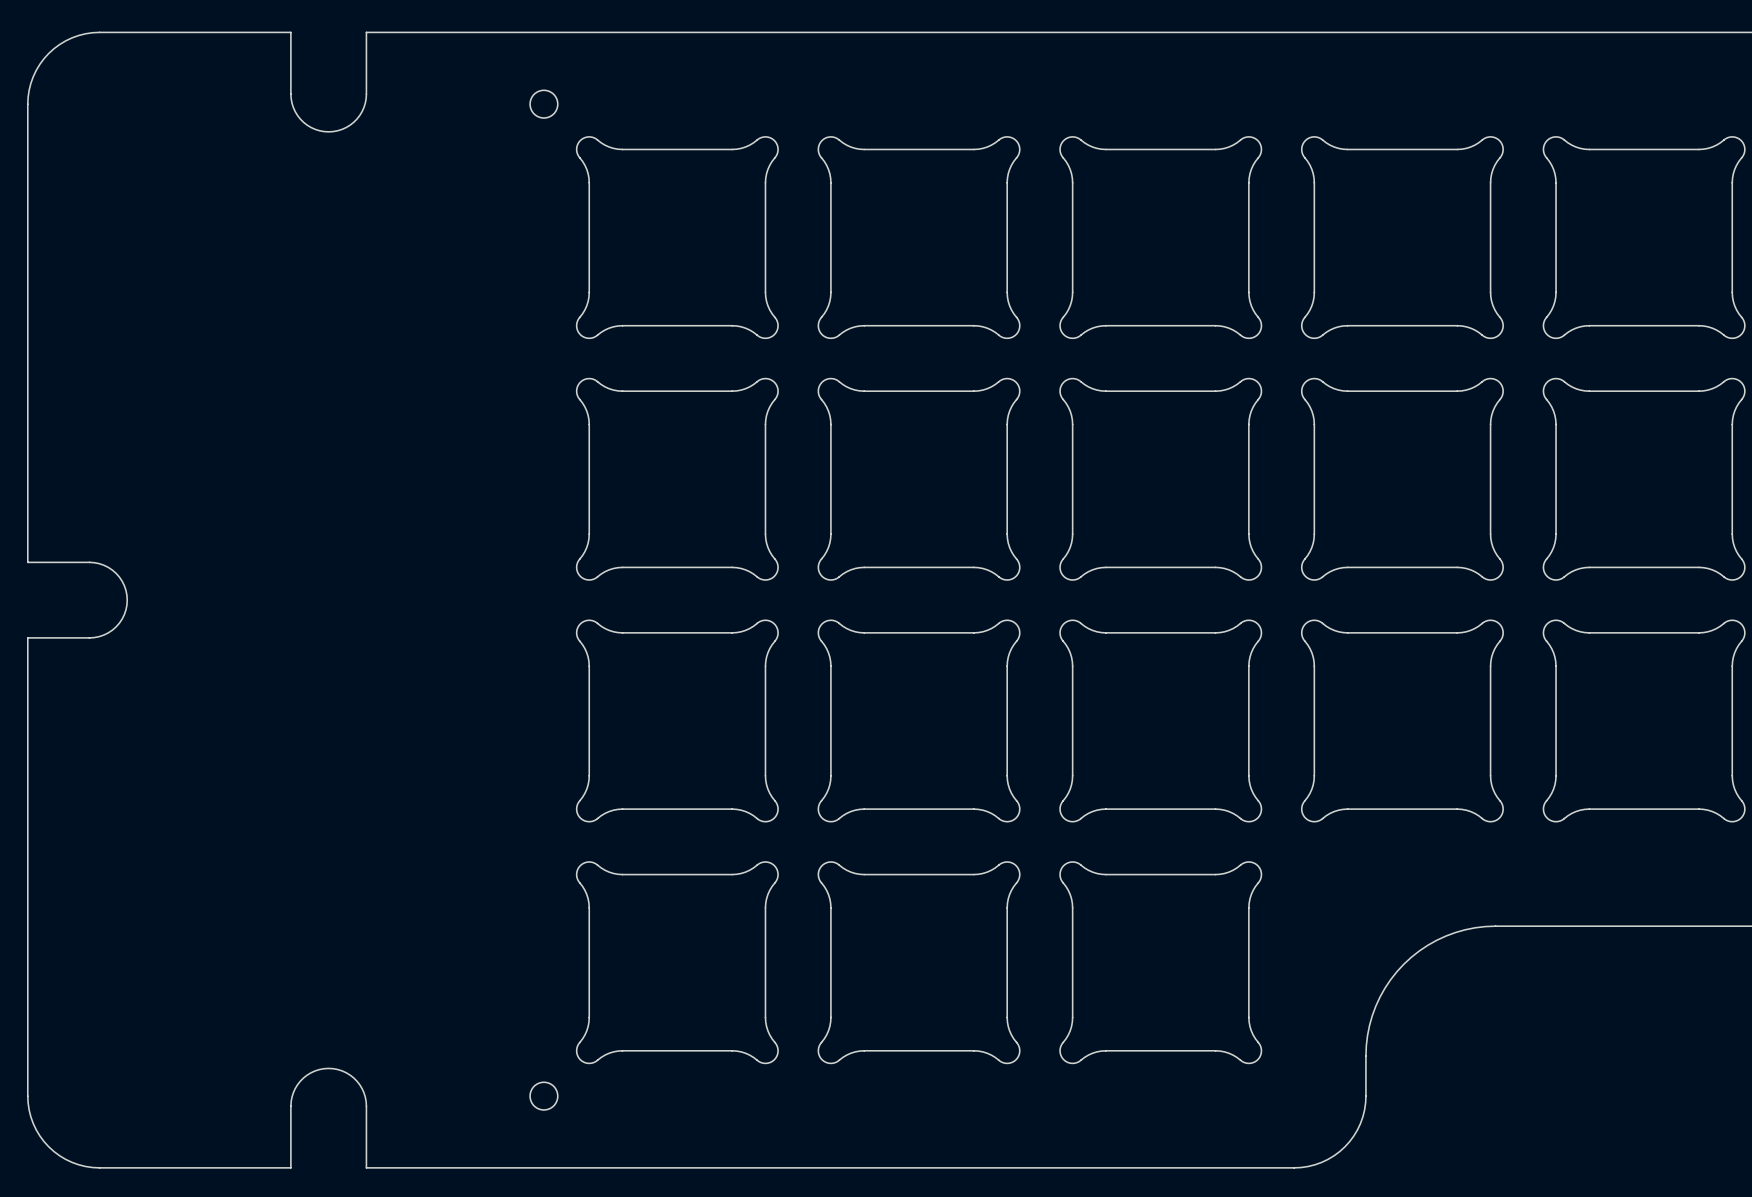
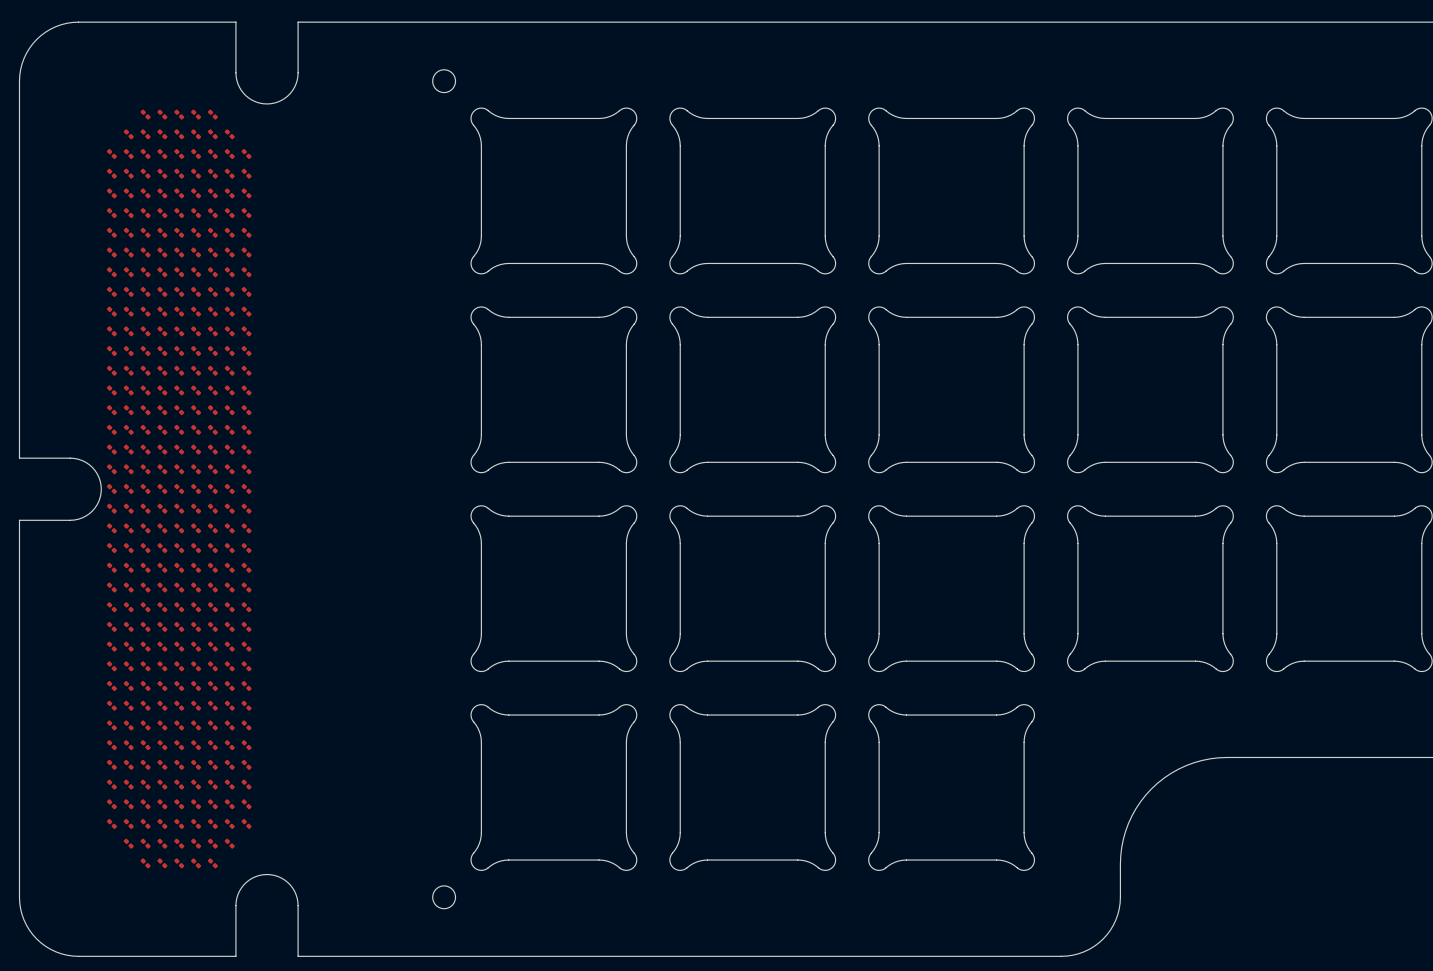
part: none -> (145, 114)
part: none -> (162, 114)
part: none -> (179, 114)
part: none -> (196, 114)
part: none -> (212, 114)
part: none -> (128, 134)
part: none -> (145, 134)
part: none -> (162, 134)
part: none -> (179, 134)
part: none -> (196, 134)
part: none -> (212, 134)
part: none -> (229, 134)
part: none -> (111, 153)
part: none -> (128, 153)
part: none -> (145, 153)
part: none -> (162, 153)
part: none -> (179, 153)
part: none -> (196, 153)
part: none -> (212, 153)
part: none -> (229, 153)
part: none -> (246, 153)
part: none -> (111, 173)
part: none -> (128, 173)
part: none -> (145, 173)
part: none -> (162, 173)
part: none -> (179, 173)
part: none -> (196, 173)
part: none -> (212, 173)
part: none -> (229, 173)
part: none -> (246, 173)
part: none -> (111, 193)
part: none -> (128, 193)
part: none -> (145, 193)
part: none -> (162, 193)
part: none -> (179, 193)
part: none -> (196, 193)
part: none -> (212, 193)
part: none -> (229, 193)
part: none -> (246, 193)
part: none -> (111, 213)
part: none -> (128, 213)
part: none -> (145, 213)
part: none -> (162, 213)
part: none -> (179, 213)
part: none -> (196, 213)
part: none -> (212, 213)
part: none -> (229, 213)
part: none -> (246, 213)
part: none -> (111, 232)
part: none -> (128, 232)
part: none -> (145, 232)
part: none -> (162, 232)
part: none -> (179, 232)
part: none -> (196, 232)
part: none -> (212, 232)
part: none -> (229, 232)
part: none -> (246, 232)
part: none -> (111, 252)
part: none -> (128, 252)
part: none -> (145, 252)
part: none -> (162, 252)
part: none -> (179, 252)
part: none -> (196, 252)
part: none -> (212, 252)
part: none -> (229, 252)
part: none -> (246, 252)
part: none -> (111, 272)
part: none -> (128, 272)
part: none -> (145, 272)
part: none -> (162, 272)
part: none -> (179, 272)
part: none -> (196, 272)
part: none -> (212, 272)
part: none -> (229, 272)
part: none -> (246, 272)
part: none -> (111, 291)
part: none -> (128, 291)
part: none -> (145, 291)
part: none -> (162, 291)
part: none -> (179, 291)
part: none -> (196, 291)
part: none -> (212, 291)
part: none -> (229, 291)
part: none -> (246, 291)
part: none -> (111, 311)
part: none -> (128, 311)
part: none -> (145, 311)
part: none -> (162, 311)
part: none -> (179, 311)
part: none -> (196, 311)
part: none -> (212, 311)
part: none -> (229, 311)
part: none -> (246, 311)
part: none -> (111, 331)
part: none -> (128, 331)
part: none -> (145, 331)
part: none -> (162, 331)
part: none -> (179, 331)
part: none -> (196, 331)
part: none -> (212, 331)
part: none -> (229, 331)
part: none -> (246, 331)
part: none -> (111, 351)
part: none -> (128, 351)
part: none -> (145, 351)
part: none -> (162, 351)
part: none -> (179, 351)
part: none -> (196, 351)
part: none -> (212, 351)
part: none -> (229, 351)
part: none -> (246, 351)
part: none -> (111, 370)
part: none -> (128, 370)
part: none -> (145, 370)
part: none -> (162, 370)
part: none -> (179, 370)
part: none -> (196, 370)
part: none -> (212, 370)
part: none -> (229, 370)
part: none -> (246, 370)
part: none -> (111, 390)
part: none -> (128, 390)
part: none -> (145, 390)
part: none -> (162, 390)
part: none -> (179, 390)
part: none -> (196, 390)
part: none -> (212, 390)
part: none -> (229, 390)
part: none -> (246, 390)
part: none -> (111, 410)
part: none -> (128, 410)
part: none -> (145, 410)
part: none -> (162, 410)
part: none -> (179, 410)
part: none -> (196, 410)
part: none -> (212, 410)
part: none -> (229, 410)
part: none -> (246, 410)
part: none -> (111, 429)
part: none -> (128, 429)
part: none -> (145, 429)
part: none -> (162, 429)
part: none -> (179, 429)
part: none -> (196, 429)
part: none -> (212, 429)
part: none -> (229, 429)
part: none -> (246, 429)
part: none -> (111, 449)
part: none -> (128, 449)
part: none -> (145, 449)
part: none -> (162, 449)
part: none -> (179, 449)
part: none -> (196, 449)
part: none -> (212, 449)
part: none -> (229, 449)
part: none -> (246, 449)
part: none -> (111, 469)
part: none -> (128, 469)
part: none -> (145, 469)
part: none -> (162, 469)
part: none -> (179, 469)
part: none -> (196, 469)
part: none -> (212, 469)
part: none -> (229, 469)
part: none -> (246, 469)
part: none -> (111, 488)
part: none -> (128, 488)
part: none -> (145, 488)
part: none -> (162, 488)
part: none -> (179, 488)
part: none -> (196, 488)
part: none -> (212, 488)
part: none -> (229, 488)
part: none -> (246, 488)
part: none -> (111, 508)
part: none -> (128, 508)
part: none -> (145, 508)
part: none -> (162, 508)
part: none -> (179, 508)
part: none -> (196, 508)
part: none -> (212, 508)
part: none -> (229, 508)
part: none -> (246, 508)
part: none -> (111, 528)
part: none -> (128, 528)
part: none -> (145, 528)
part: none -> (162, 528)
part: none -> (179, 528)
part: none -> (196, 528)
part: none -> (212, 528)
part: none -> (229, 528)
part: none -> (246, 528)
part: none -> (111, 548)
part: none -> (128, 548)
part: none -> (145, 548)
part: none -> (162, 548)
part: none -> (179, 548)
part: none -> (196, 548)
part: none -> (212, 548)
part: none -> (229, 548)
part: none -> (246, 548)
part: none -> (111, 567)
part: none -> (128, 567)
part: none -> (145, 567)
part: none -> (162, 567)
part: none -> (179, 567)
part: none -> (196, 567)
part: none -> (212, 567)
part: none -> (229, 567)
part: none -> (246, 567)
part: none -> (111, 587)
part: none -> (128, 587)
part: none -> (145, 587)
part: none -> (162, 587)
part: none -> (179, 587)
part: none -> (196, 587)
part: none -> (212, 587)
part: none -> (229, 587)
part: none -> (246, 587)
part: none -> (111, 607)
part: none -> (128, 607)
part: none -> (145, 607)
part: none -> (162, 607)
part: none -> (179, 607)
part: none -> (196, 607)
part: none -> (212, 607)
part: none -> (229, 607)
part: none -> (246, 607)
part: none -> (111, 626)
part: none -> (128, 626)
part: none -> (145, 626)
part: none -> (162, 626)
part: none -> (179, 626)
part: none -> (196, 626)
part: none -> (212, 626)
part: none -> (229, 626)
part: none -> (246, 626)
part: none -> (111, 646)
part: none -> (128, 646)
part: none -> (145, 646)
part: none -> (162, 646)
part: none -> (179, 646)
part: none -> (196, 646)
part: none -> (212, 646)
part: none -> (229, 646)
part: none -> (246, 646)
part: none -> (111, 666)
part: none -> (128, 666)
part: none -> (145, 666)
part: none -> (162, 666)
part: none -> (179, 666)
part: none -> (196, 666)
part: none -> (212, 666)
part: none -> (229, 666)
part: none -> (246, 666)
part: none -> (111, 686)
part: none -> (128, 686)
part: none -> (145, 686)
part: none -> (162, 686)
part: none -> (179, 686)
part: none -> (196, 686)
part: none -> (212, 686)
part: none -> (229, 686)
part: none -> (246, 686)
part: none -> (111, 705)
part: none -> (128, 705)
part: none -> (145, 705)
part: none -> (162, 705)
part: none -> (179, 705)
part: none -> (196, 705)
part: none -> (212, 705)
part: none -> (229, 705)
part: none -> (246, 705)
part: none -> (111, 725)
part: none -> (128, 725)
part: none -> (145, 725)
part: none -> (162, 725)
part: none -> (179, 725)
part: none -> (196, 725)
part: none -> (212, 725)
part: none -> (229, 725)
part: none -> (246, 725)
part: none -> (111, 745)
part: none -> (128, 745)
part: none -> (145, 745)
part: none -> (162, 745)
part: none -> (179, 745)
part: none -> (196, 745)
part: none -> (212, 745)
part: none -> (229, 745)
part: none -> (246, 745)
part: none -> (111, 764)
part: none -> (128, 764)
part: none -> (145, 764)
part: none -> (162, 764)
part: none -> (179, 764)
part: none -> (196, 764)
part: none -> (212, 764)
part: none -> (229, 764)
part: none -> (246, 764)
part: none -> (111, 784)
part: none -> (128, 784)
part: none -> (145, 784)
part: none -> (162, 784)
part: none -> (179, 784)
part: none -> (196, 784)
part: none -> (212, 784)
part: none -> (229, 784)
part: none -> (246, 784)
part: none -> (111, 804)
part: none -> (128, 804)
part: none -> (145, 804)
part: none -> (162, 804)
part: none -> (179, 804)
part: none -> (196, 804)
part: none -> (212, 804)
part: none -> (229, 804)
part: none -> (246, 804)
part: none -> (111, 823)
part: none -> (128, 823)
part: none -> (145, 823)
part: none -> (162, 823)
part: none -> (179, 823)
part: none -> (196, 823)
part: none -> (212, 823)
part: none -> (229, 823)
part: none -> (246, 823)
part: none -> (128, 843)
part: none -> (145, 843)
part: none -> (162, 843)
part: none -> (179, 843)
part: none -> (196, 843)
part: none -> (212, 843)
part: none -> (229, 843)
part: none -> (145, 863)
part: none -> (162, 863)
part: none -> (179, 863)
part: none -> (196, 863)
part: none -> (212, 863)

